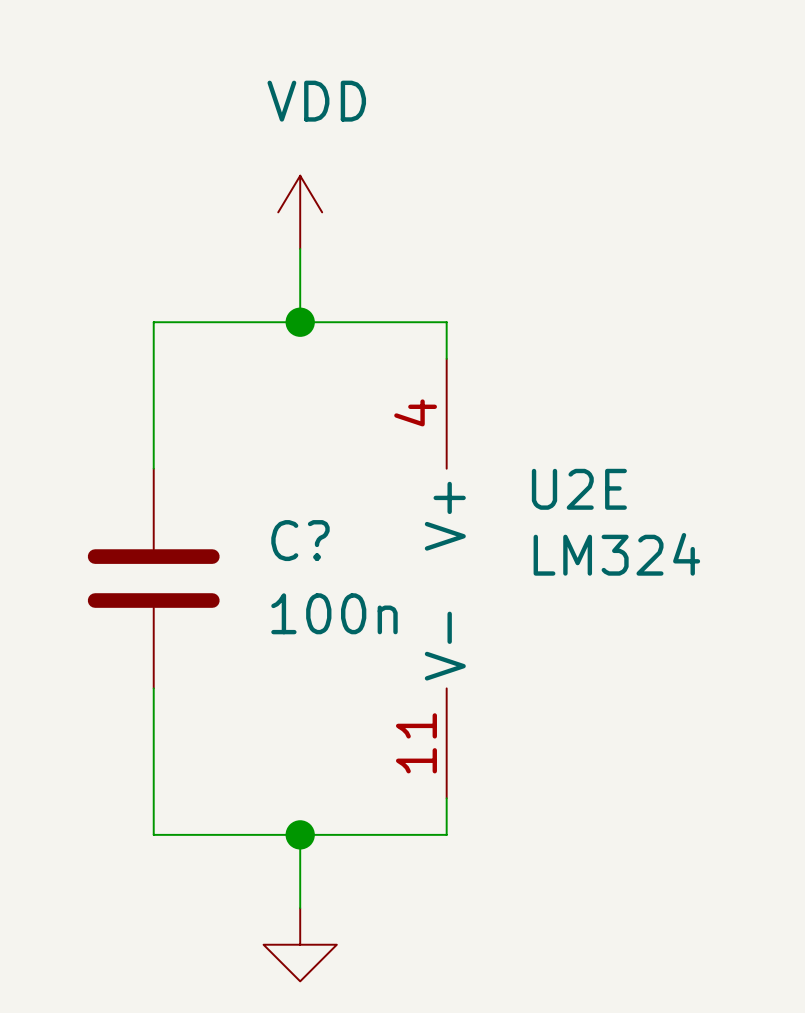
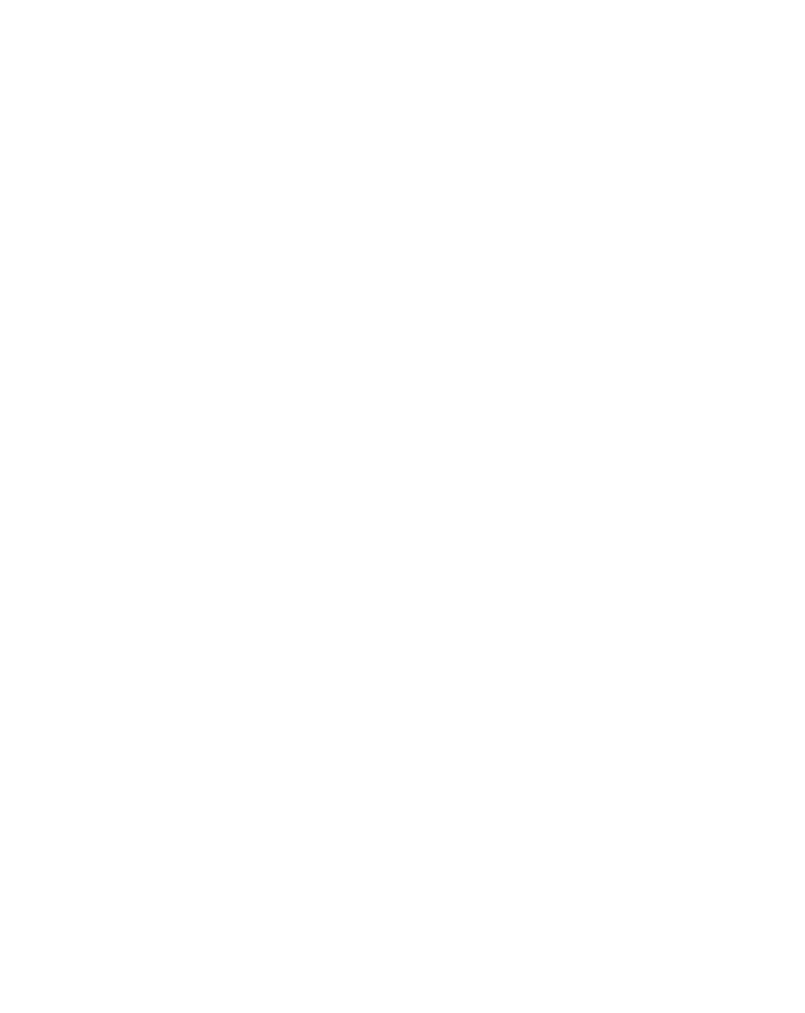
power symbol: VDD (300, 212) -> none
wire: (300, 248) (300, 322) -> none
junction: (300, 322) -> none
wire: (446, 358) (446, 322) (153, 322) (153, 468) -> none
C?: 100n (153, 578) -> none
U2E: LM324 (446, 578) -> none
wire: (153, 688) (153, 834) (446, 834) (446, 798) -> none
wire: (300, 834) (300, 908) -> none
junction: (300, 834) -> none
power symbol: (300, 944) -> none

